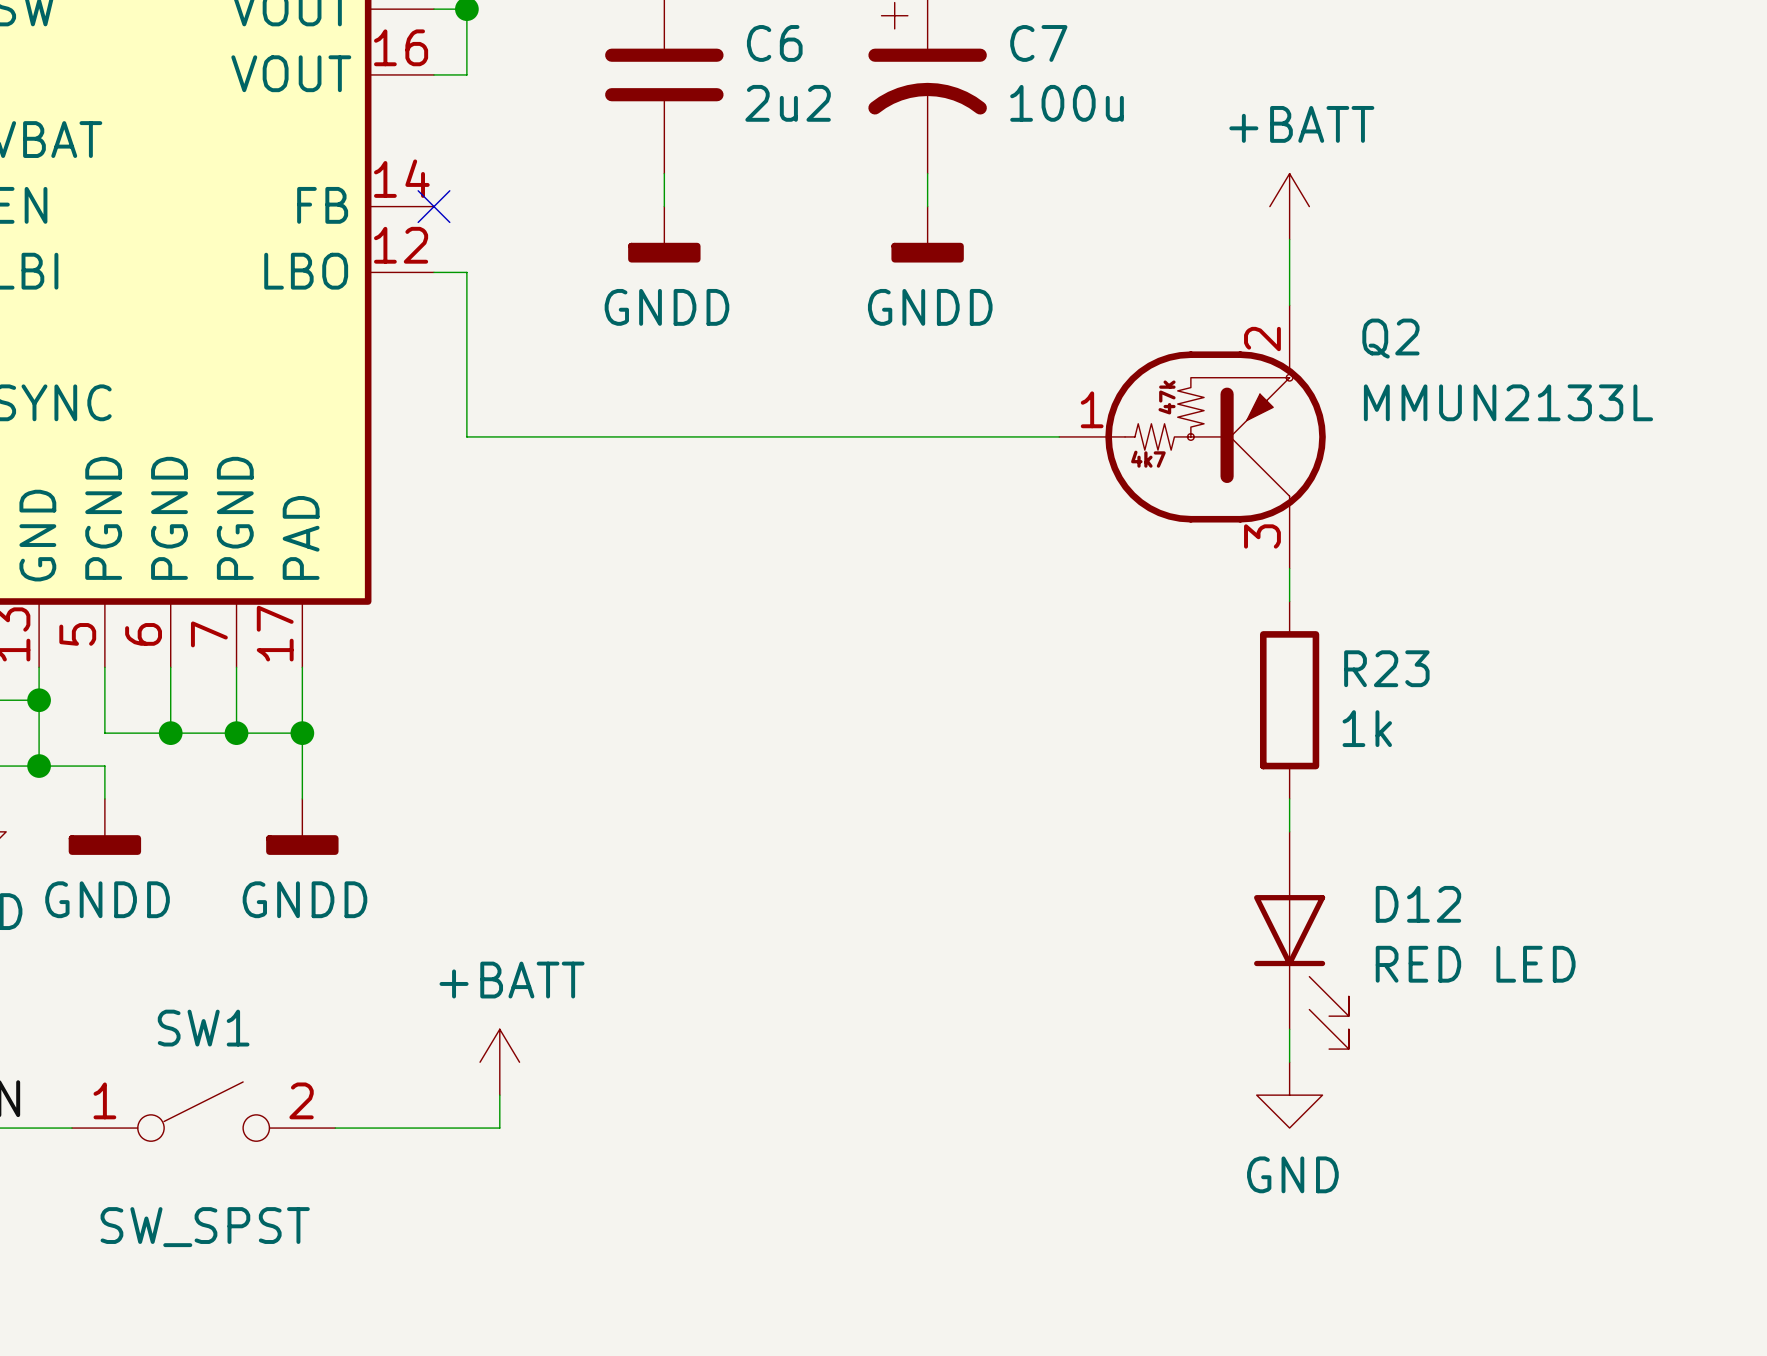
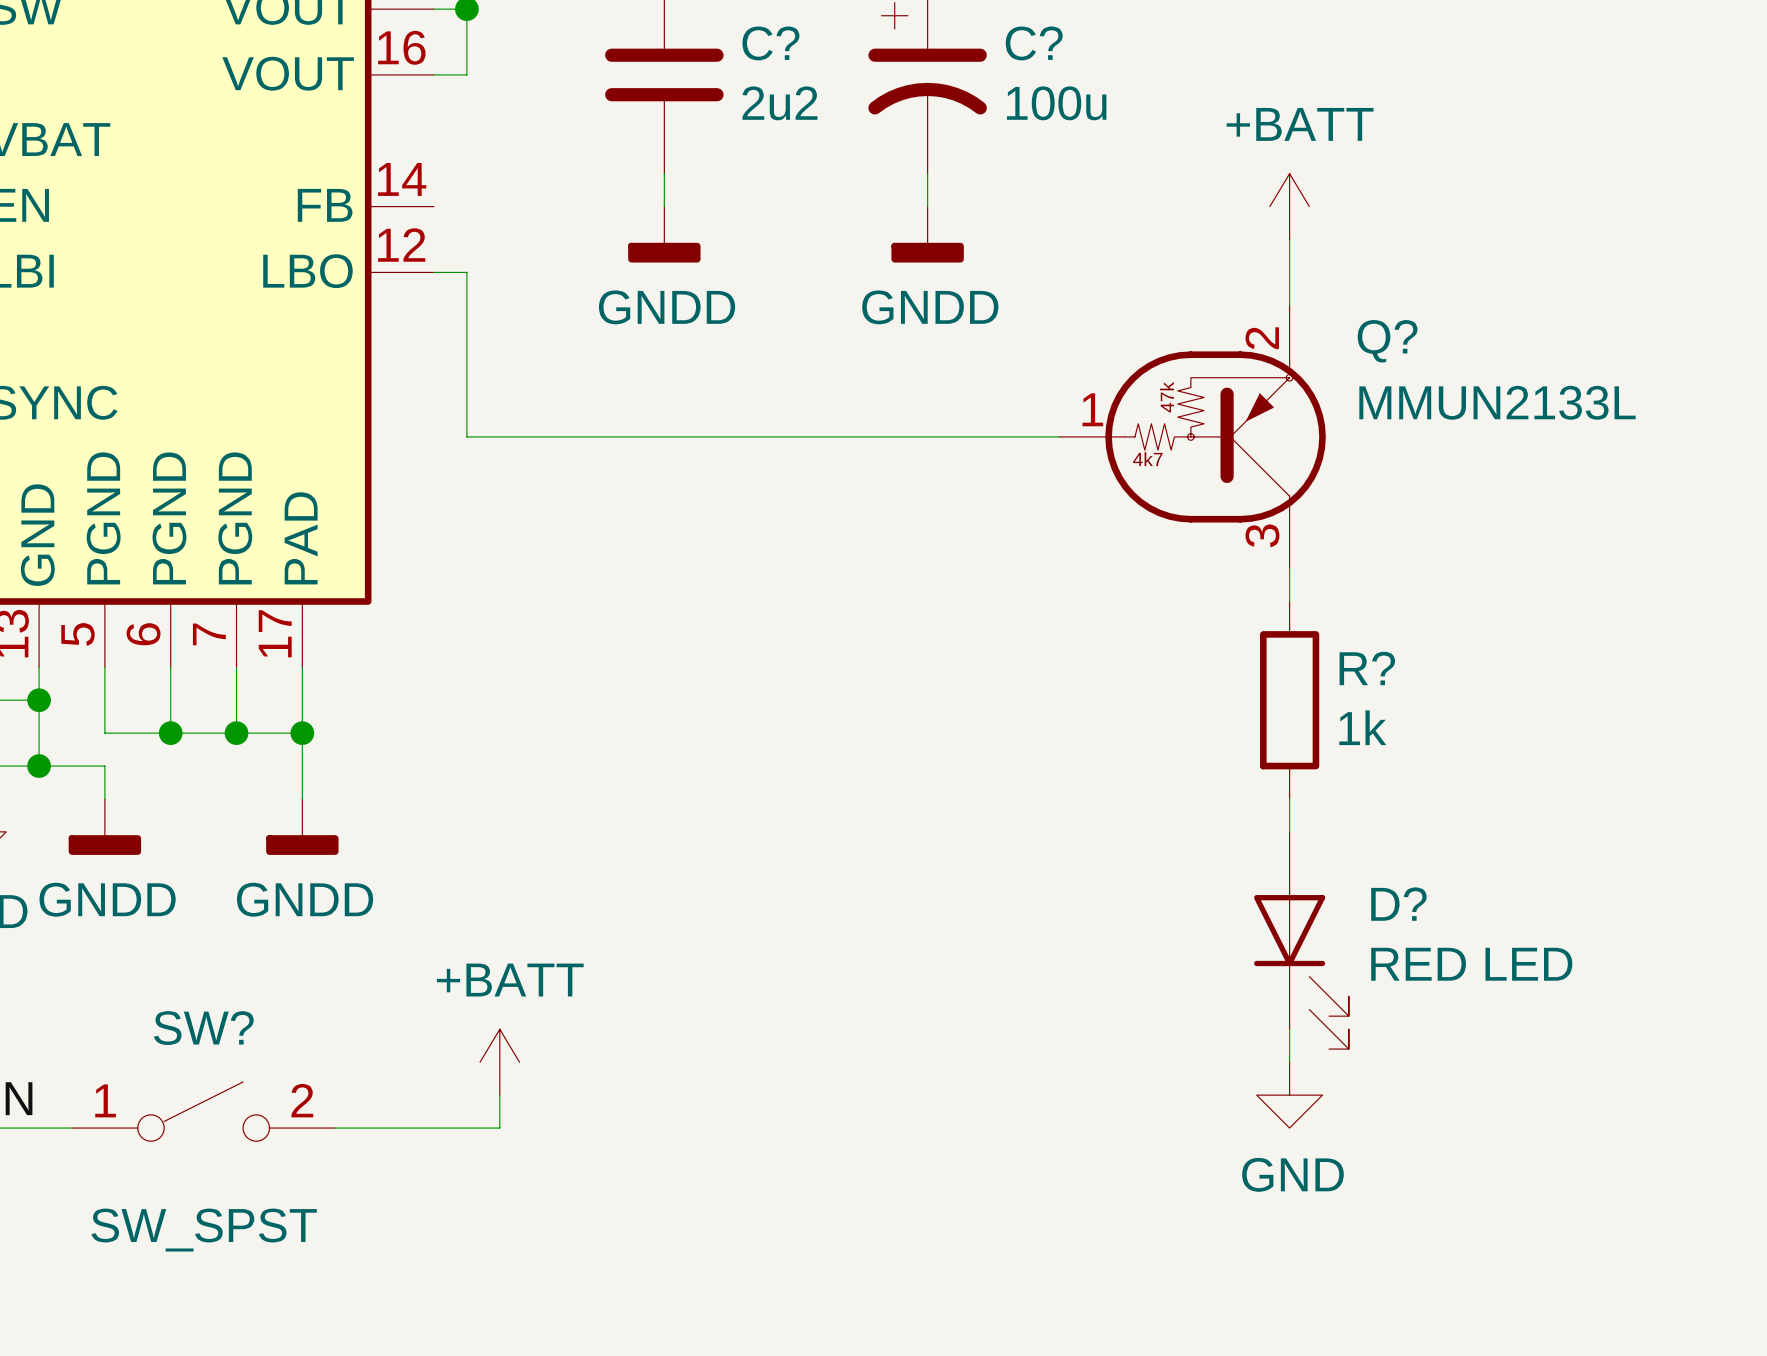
C6 name: C6 (774, 43) -> C? (770, 43)
C7 name: C7 (1038, 43) -> C? (1034, 43)
no-connect mark: (433, 206) -> none
Q2 name: Q2 (1390, 338) -> Q? (1387, 341)
R23 name: R23 (1386, 668) -> R? (1367, 668)
D12 name: D12 (1418, 904) -> D? (1398, 904)
SW1 name: SW1 (203, 1028) -> SW? (203, 1028)

